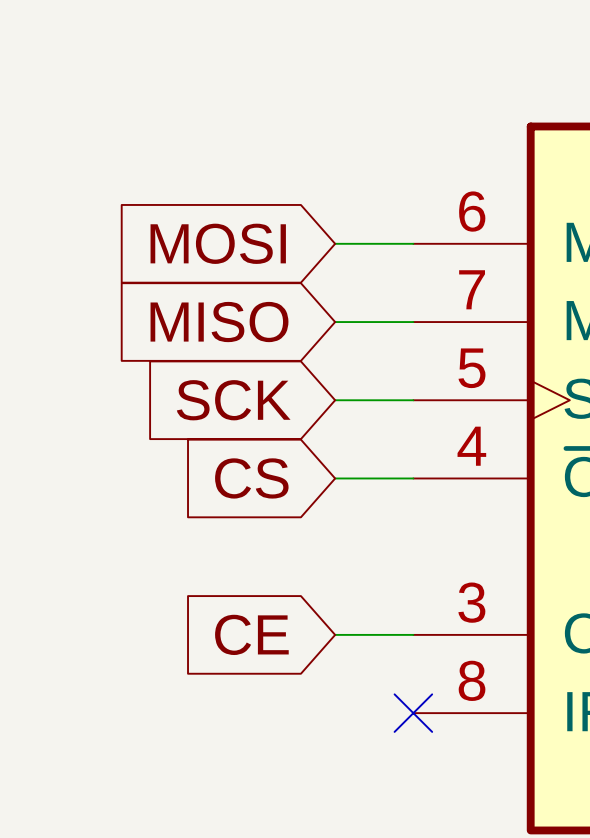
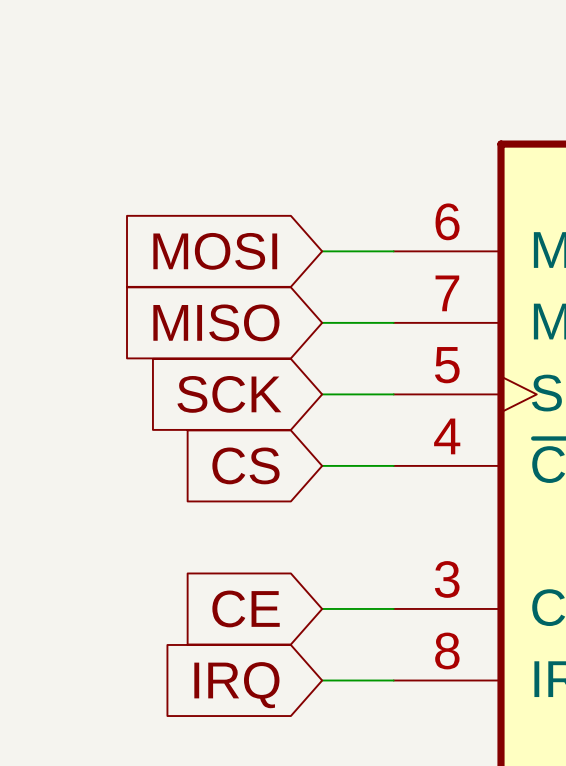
wire: none -> (322, 680) (393, 680)
no-connect mark: (413, 713) -> none
global label: none -> IRQ (236, 685)

